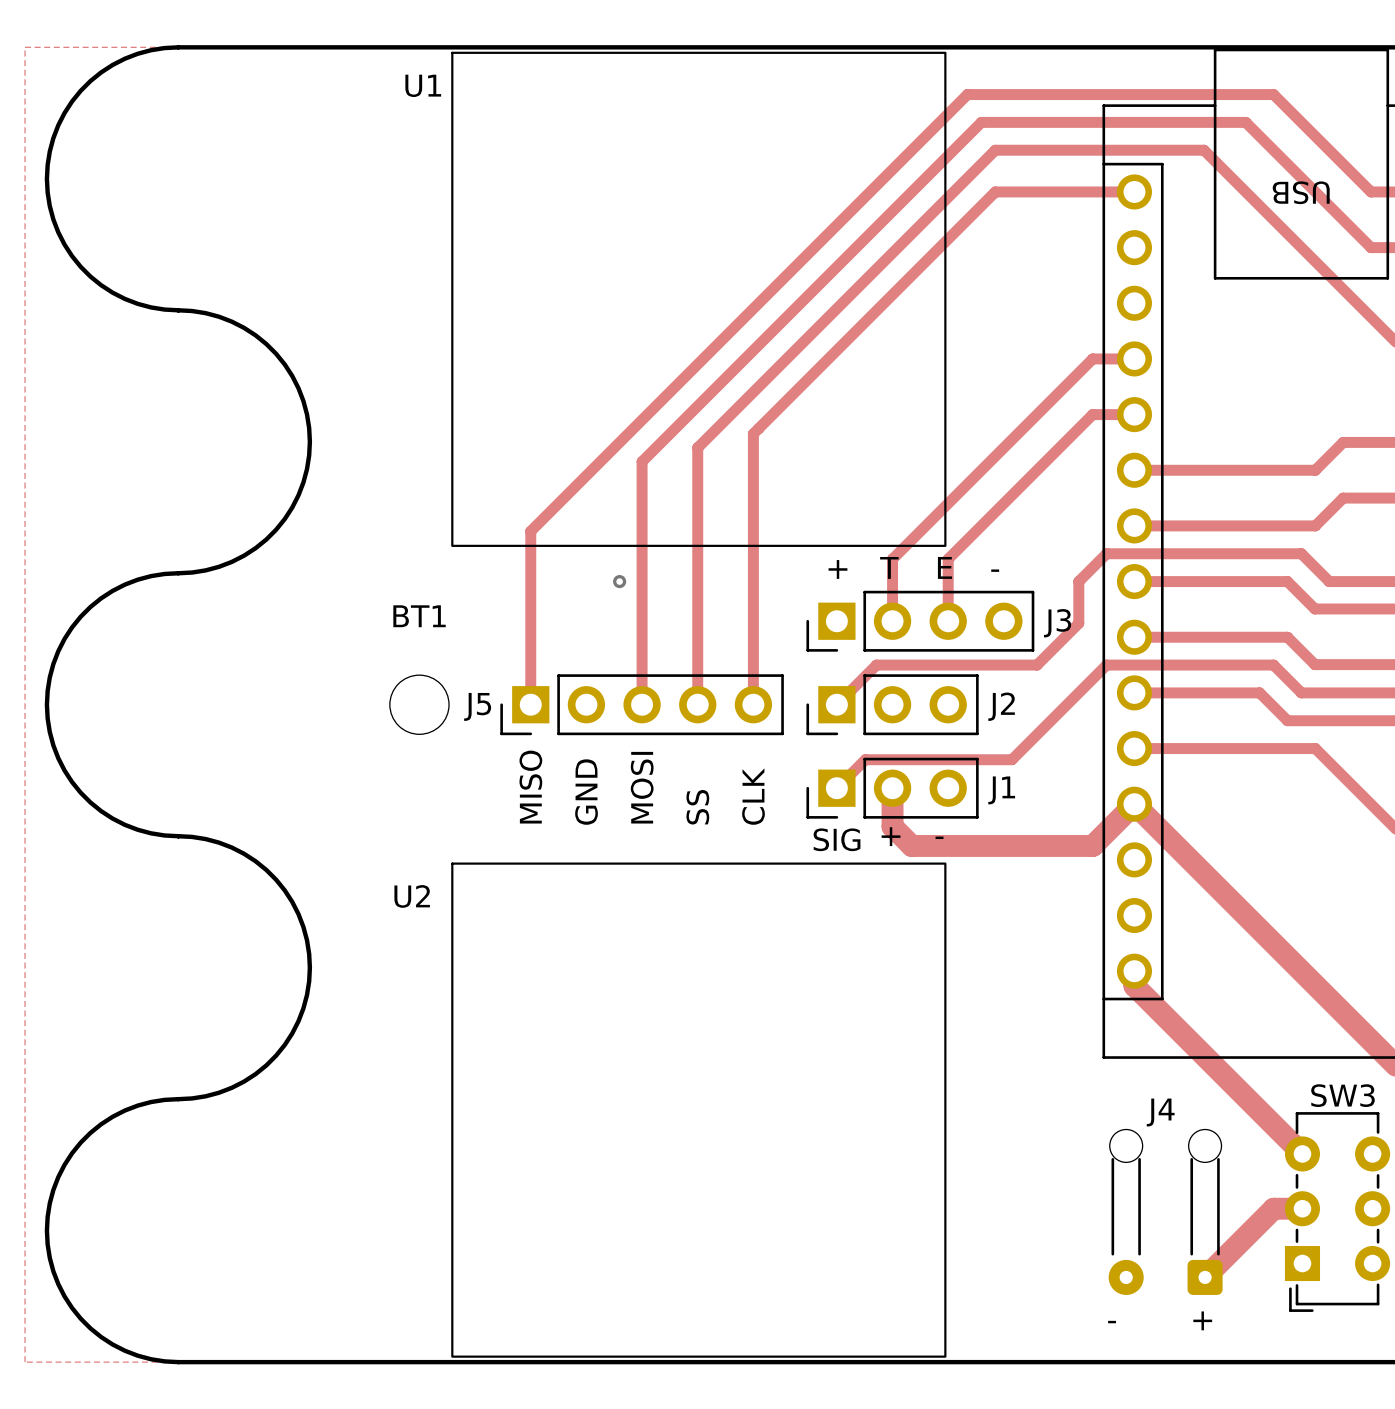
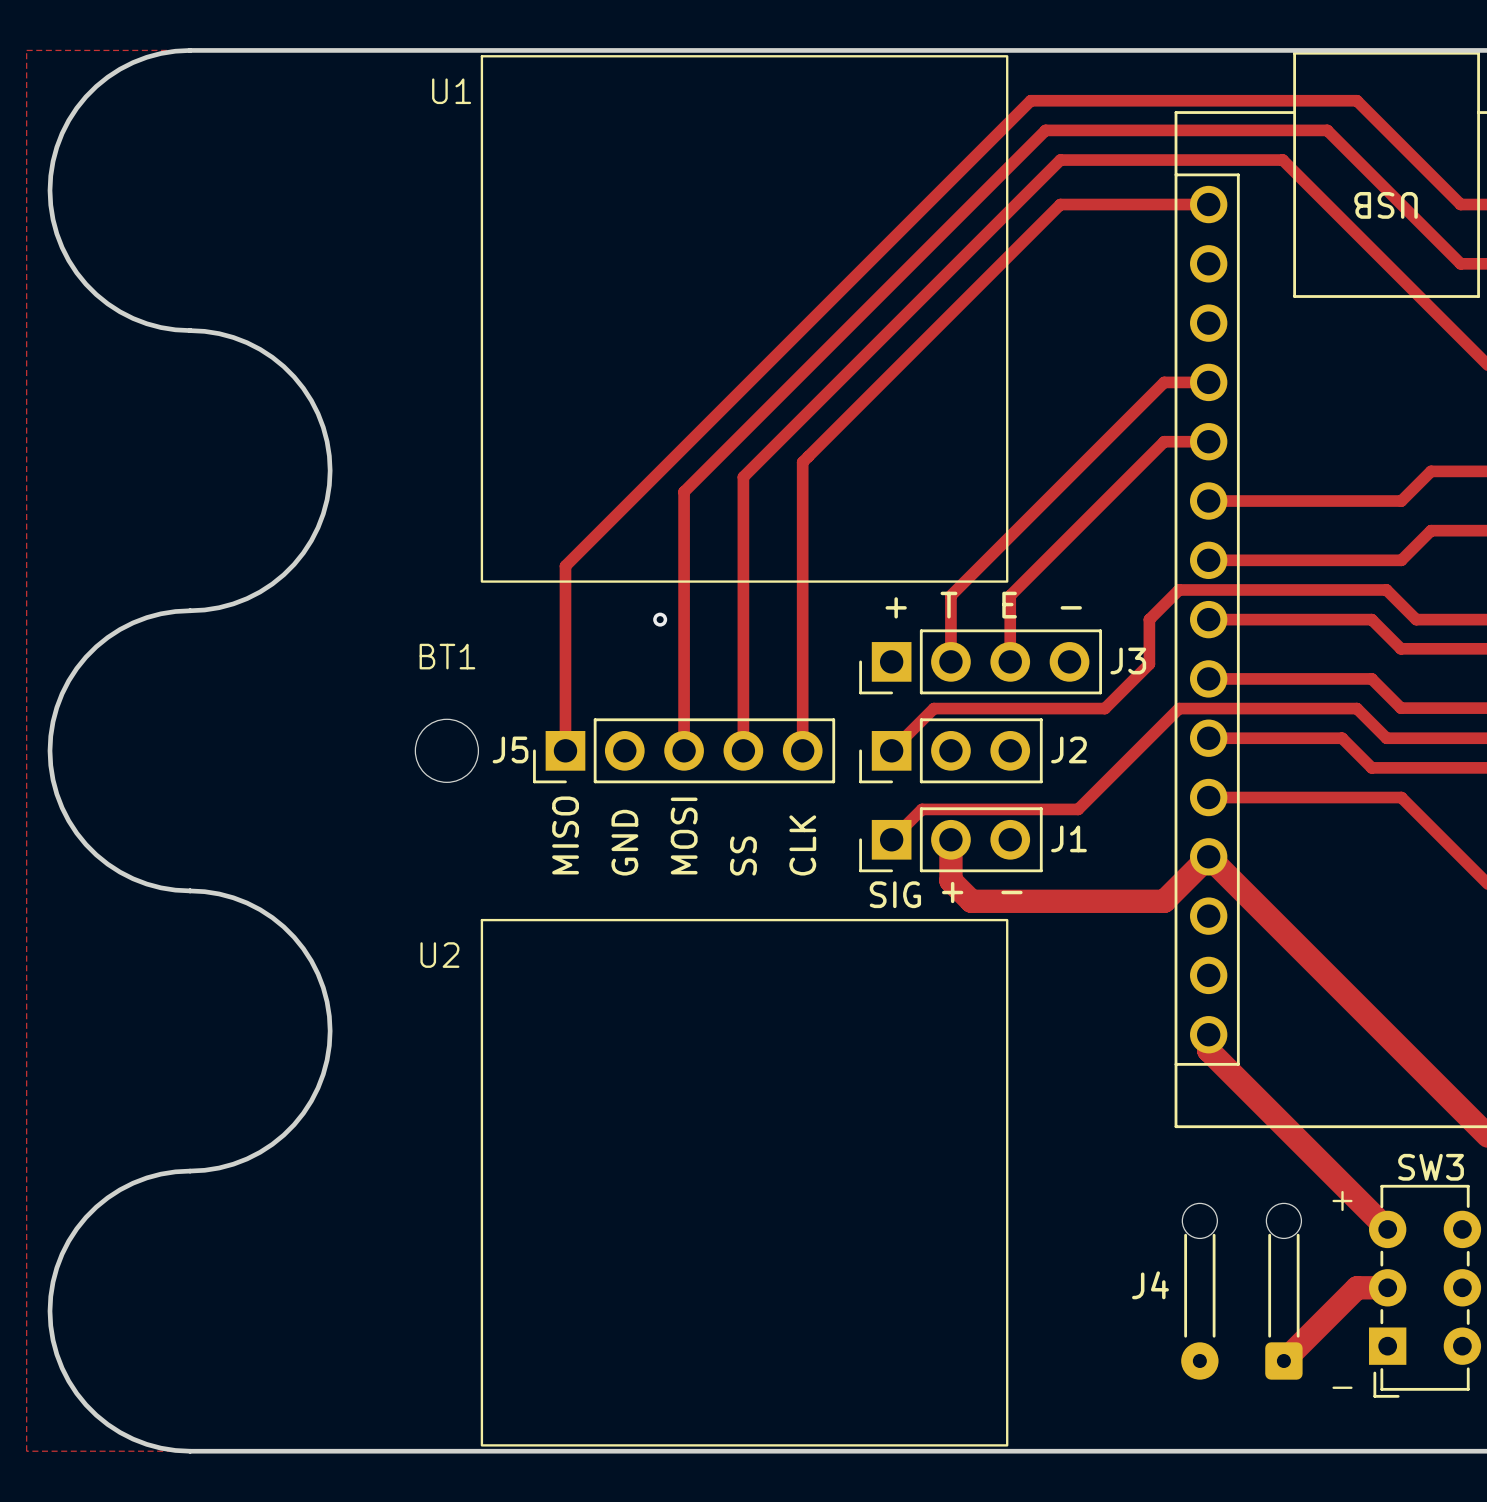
J4 name position: J4 (1160, 1112) -> J4 (1150, 1285)
text position: + (1202, 1320) -> + (1342, 1200)
text position: - (1112, 1322) -> - (1342, 1387)

